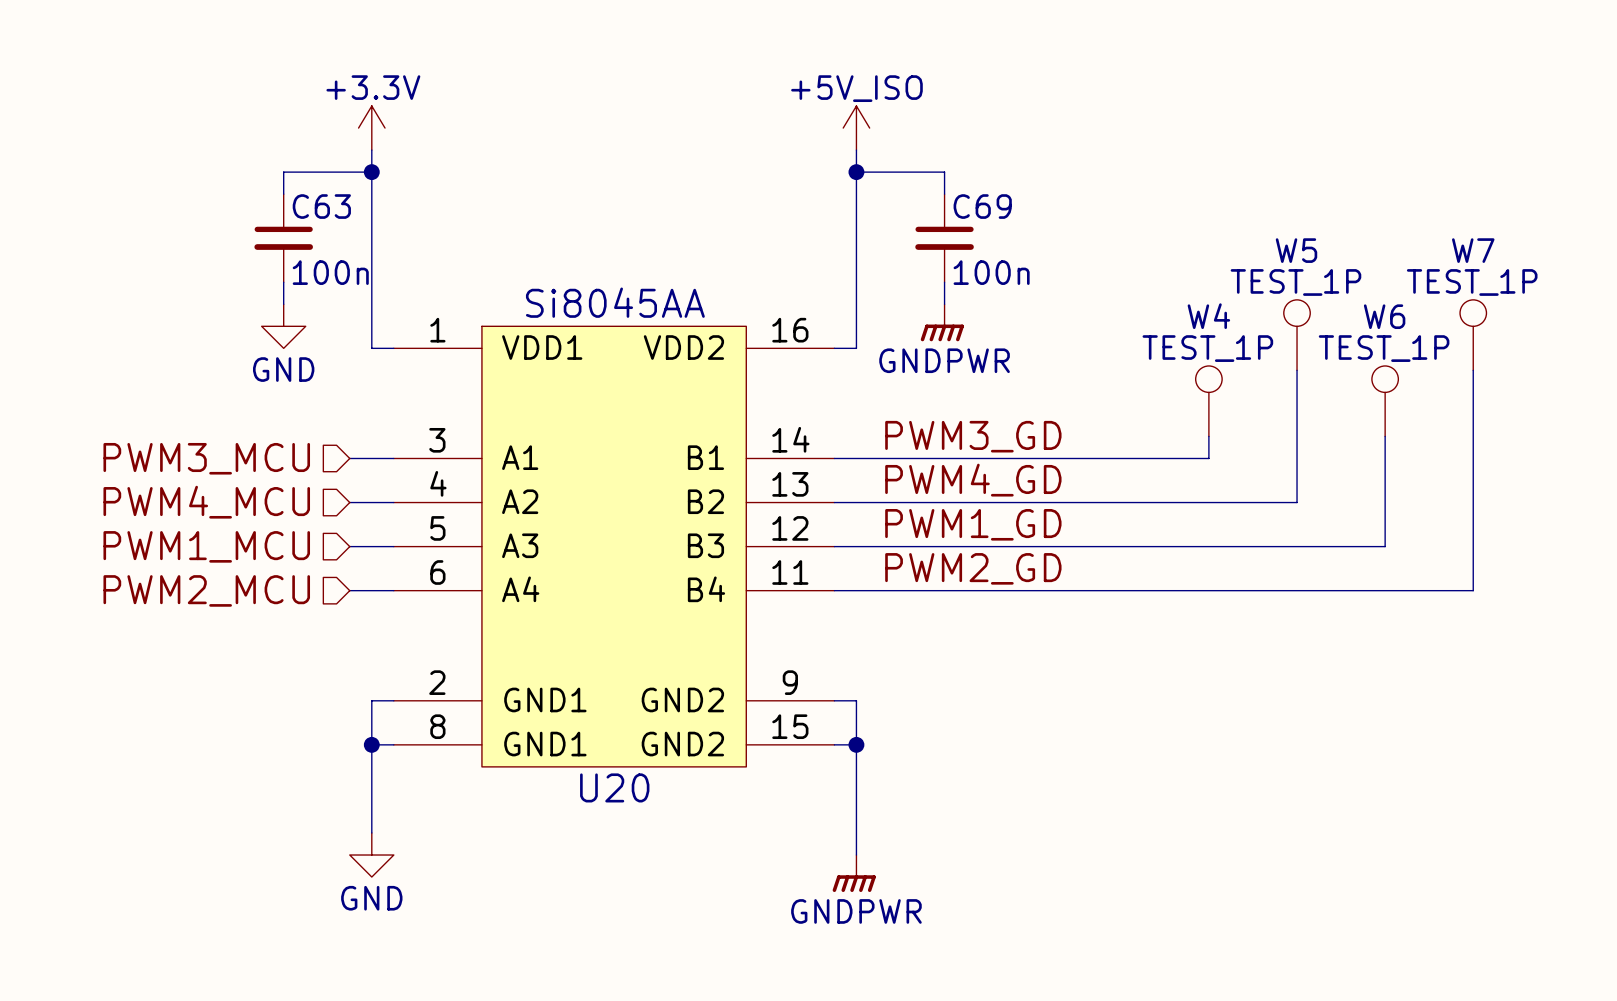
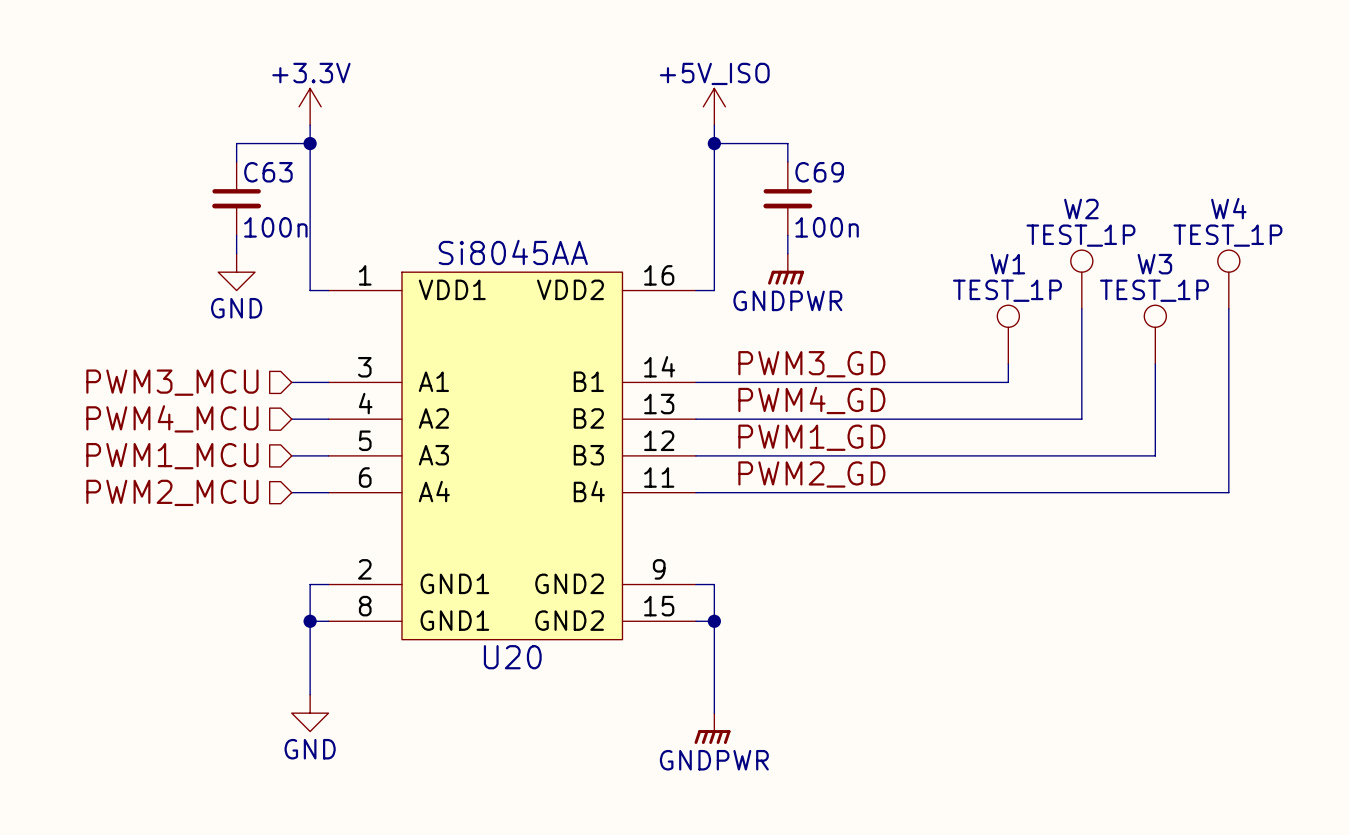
W5 name: W5 (1296, 250) -> W2 (1081, 209)
W7 name: W7 (1473, 250) -> W4 (1228, 208)
W4 name: W4 (1208, 316) -> W1 (1007, 264)
W6 name: W6 (1384, 316) -> W3 (1154, 264)

